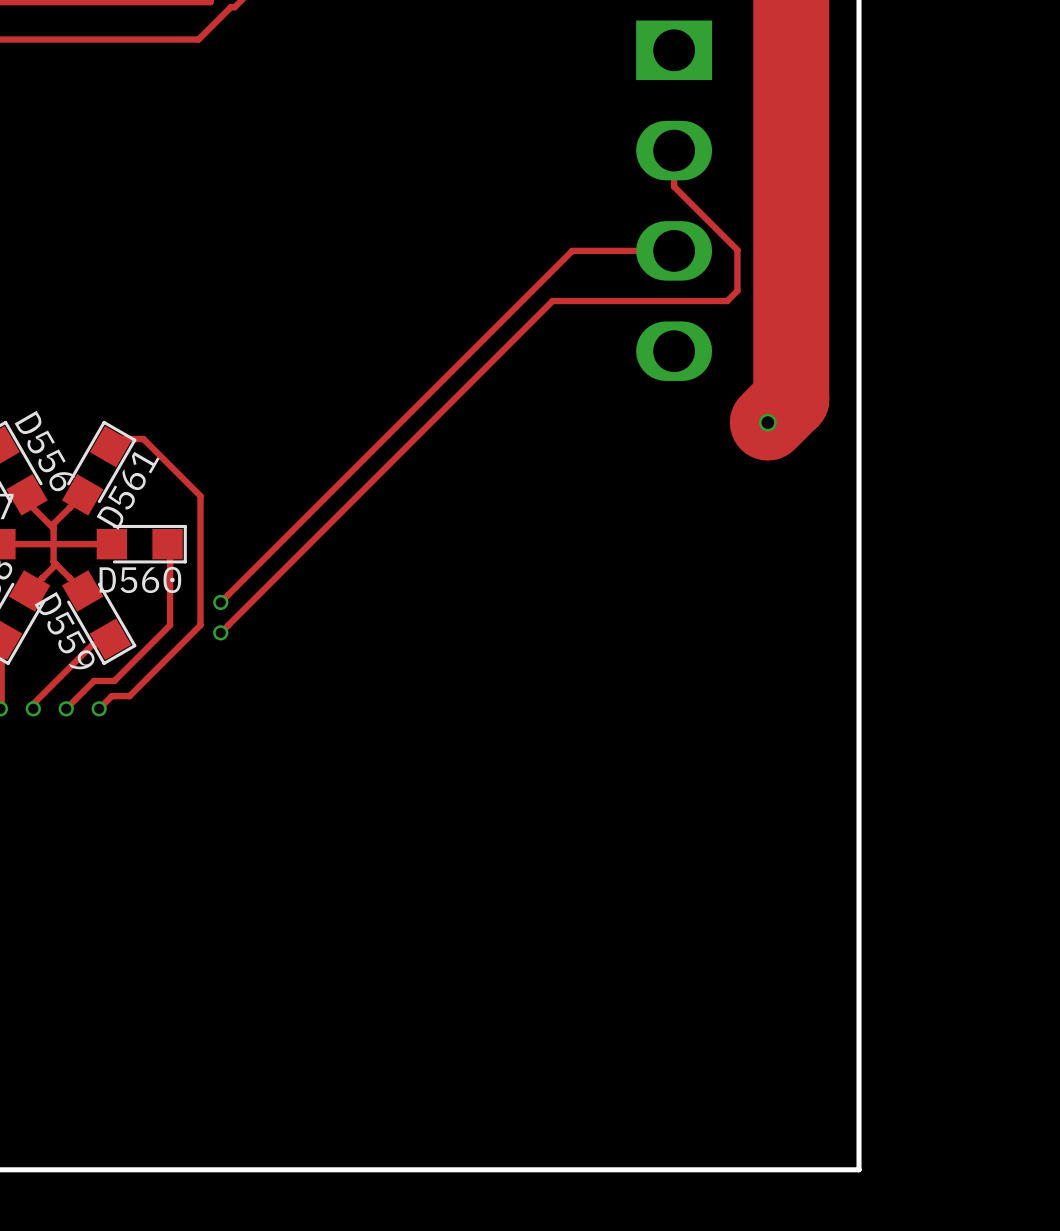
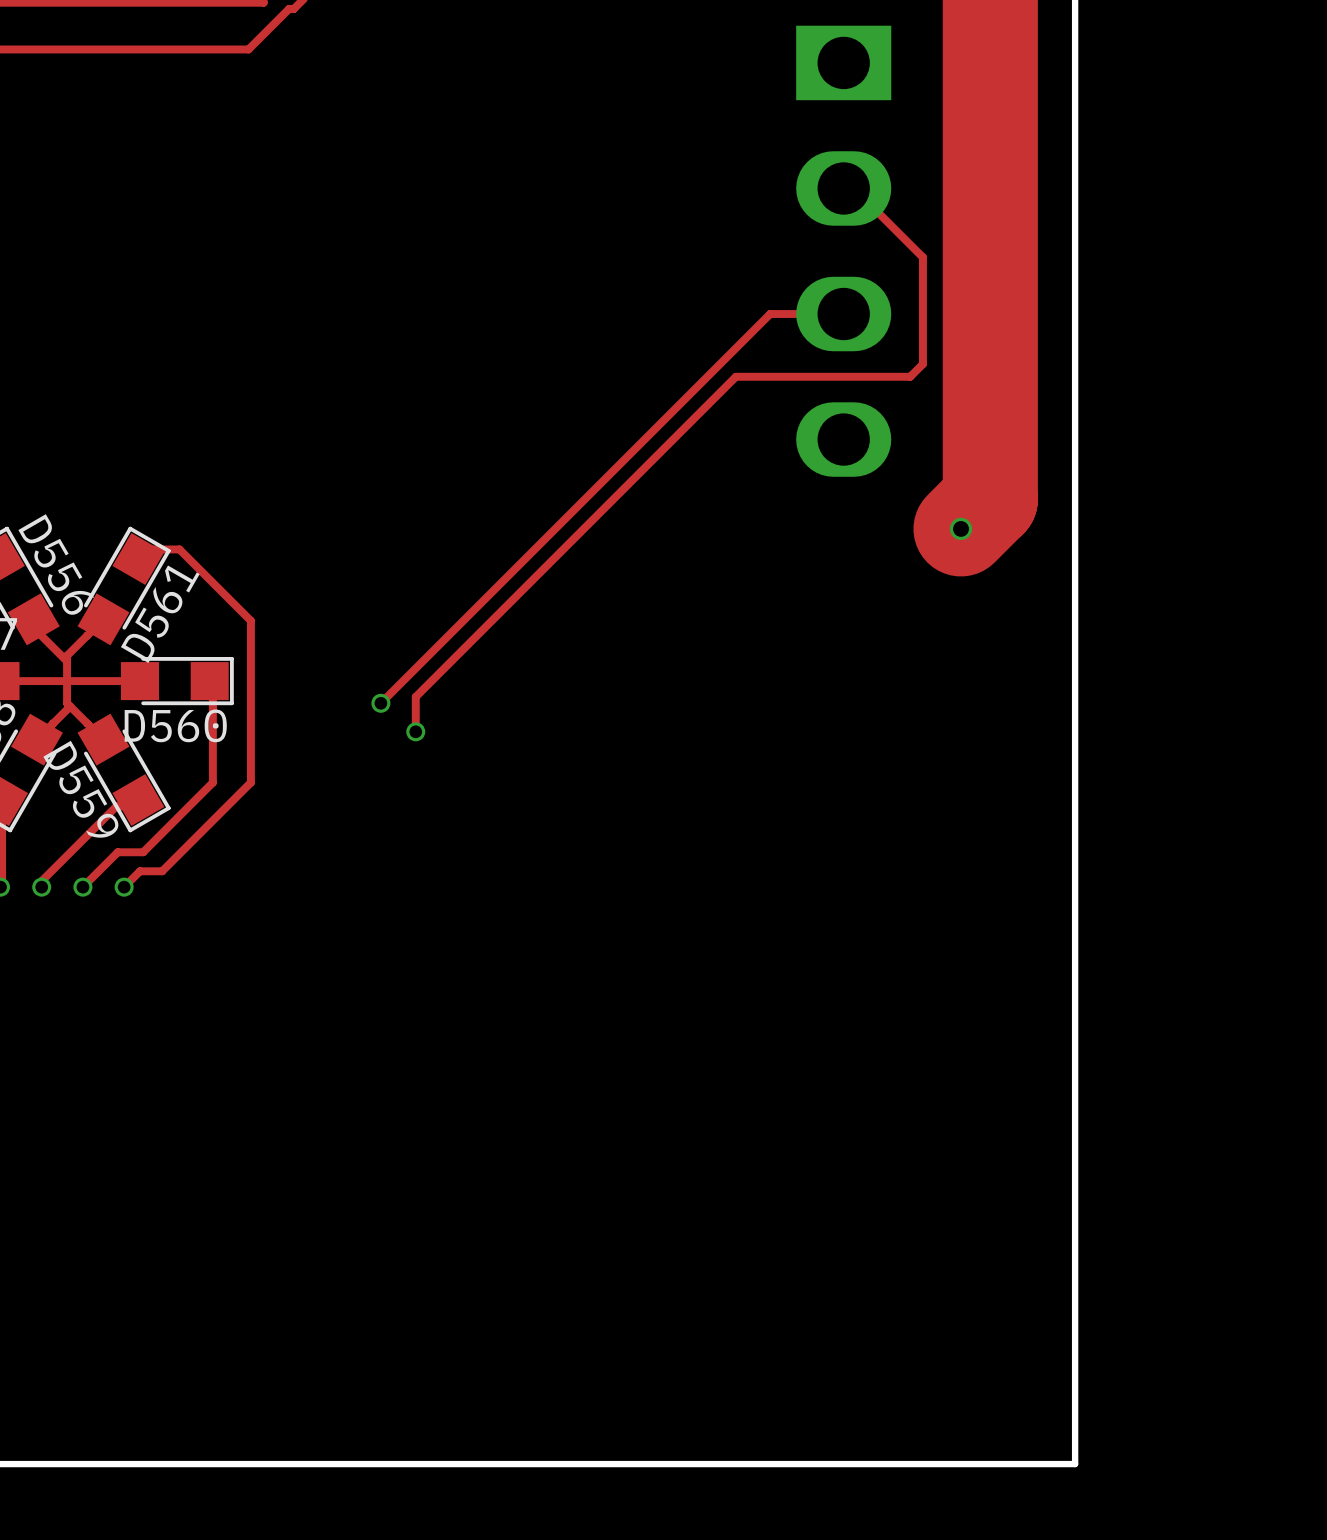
track: (674, 150) (674, 186) (737, 250) -> (843, 188) (854, 188) (922, 257) (922, 312)
track: (615, 250) (572, 250) (220, 602) -> (770, 314) (380, 703)
track: (588, 301) (552, 301) (220, 632) -> (735, 376) (415, 696) (415, 731)
via: none -> (380, 703)
via: none -> (415, 731)
via: (220, 602) -> none
via: (220, 632) -> none

